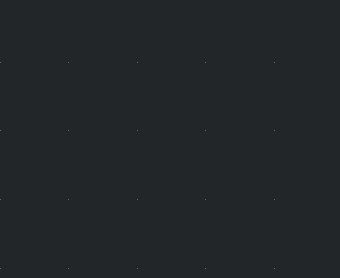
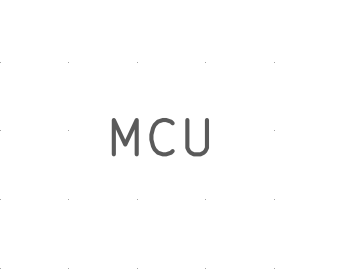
text: none -> MCU (160, 137)

